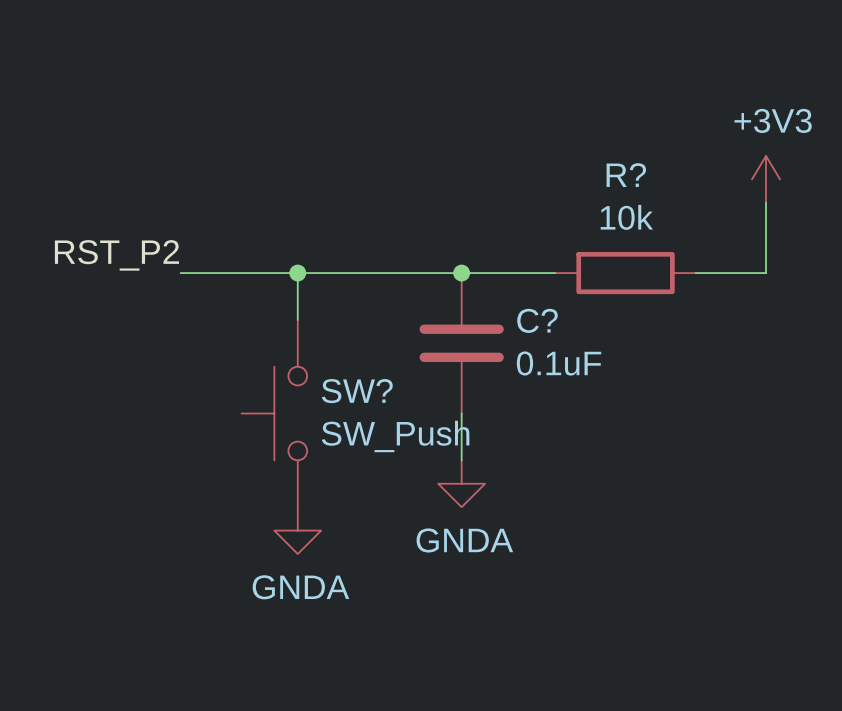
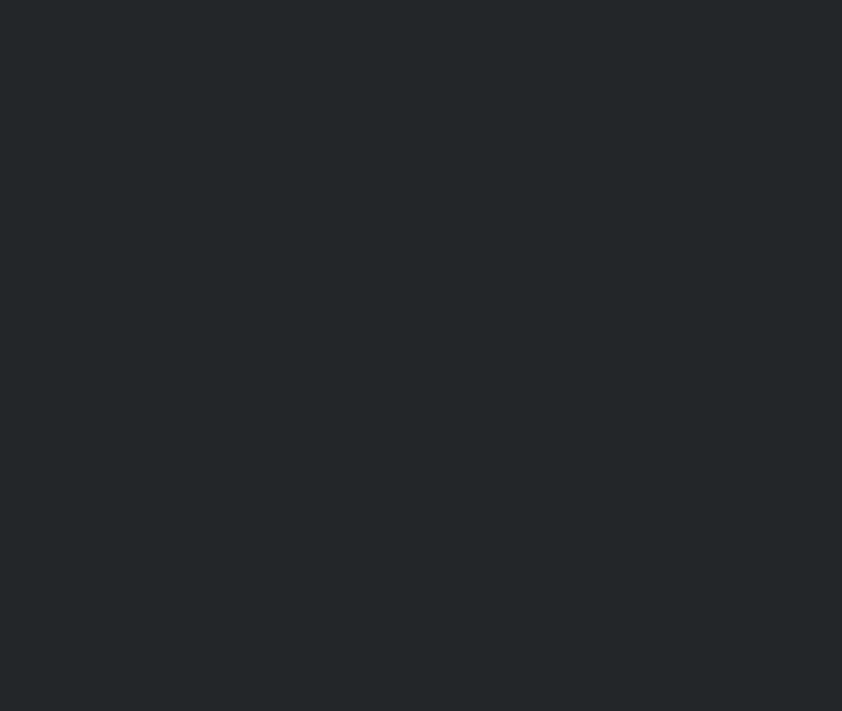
power symbol: +3V3 (766, 179) -> none
wire: (766, 202) (766, 273) (695, 273) -> none
label: RST_P2 (116, 255) -> none
wire: (180, 273) (555, 273) -> none
wire: (297, 273) (297, 319) -> none
junction: (297, 273) -> none
junction: (461, 273) -> none
R?: 10k (625, 273) -> none
C?: 0.1uF (461, 343) -> none
SW?: SW_Push (274, 413) -> none
wire: (461, 413) (461, 460) -> none
power symbol: GNDA (461, 483) -> none
power symbol: GNDA (297, 530) -> none

